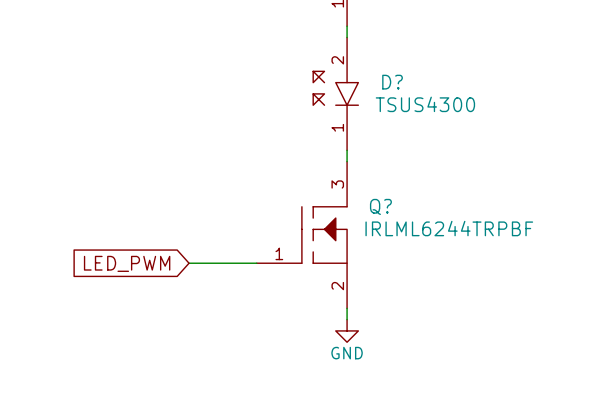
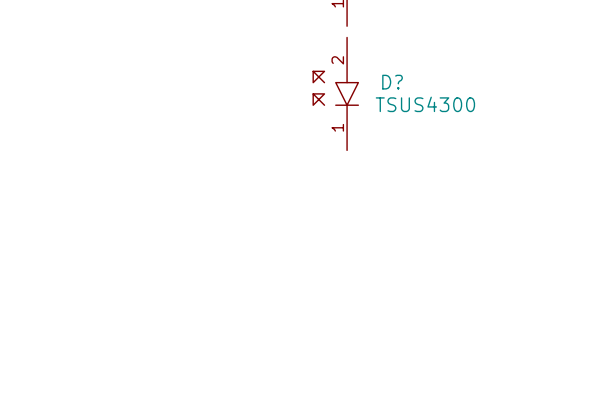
wire: (347, 26) (347, 37) -> none
wire: (347, 150) (347, 161) -> none
Q?: IRLML6244TRPBF (301, 235) -> none
global label: LED_PWM (127, 263) -> none
wire: (189, 263) (256, 263) -> none
wire: (347, 308) (347, 319) -> none
power symbol: GND (347, 330) -> none

